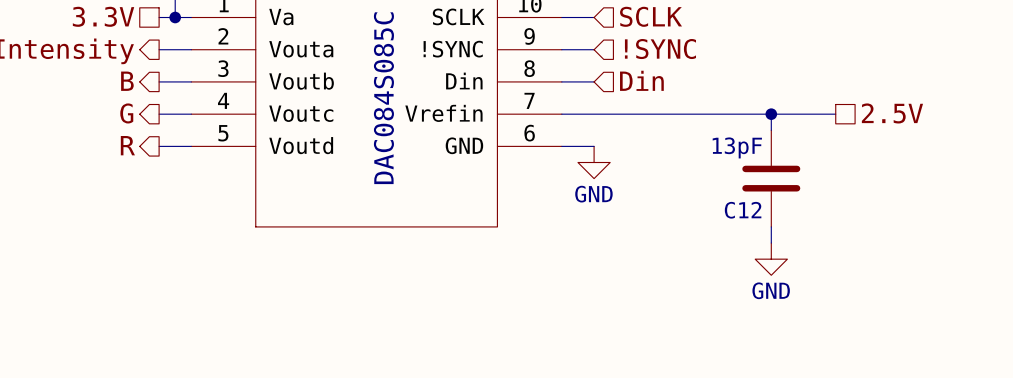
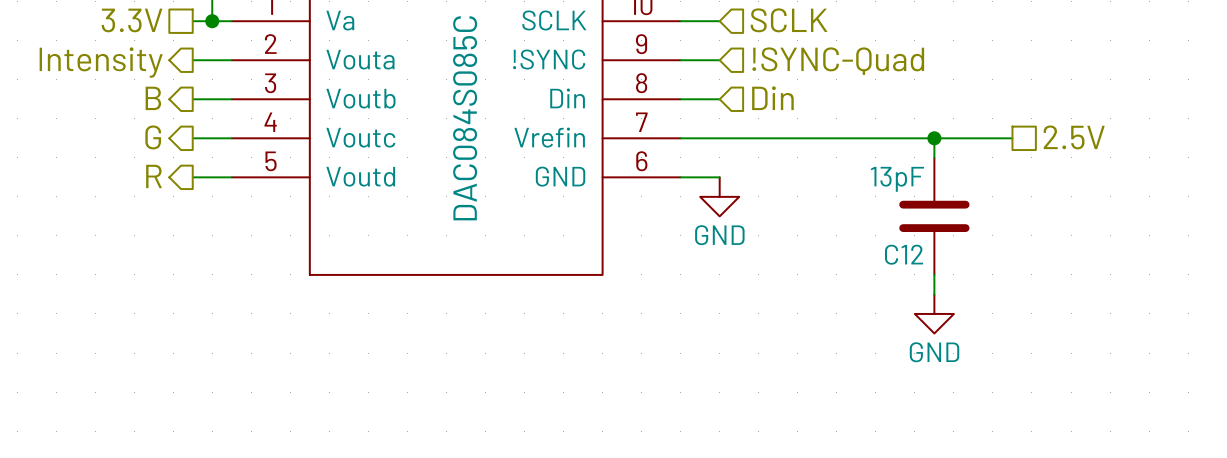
hierarchical label: !SYNC (660, 49) -> !SYNC-Quad (838, 61)

